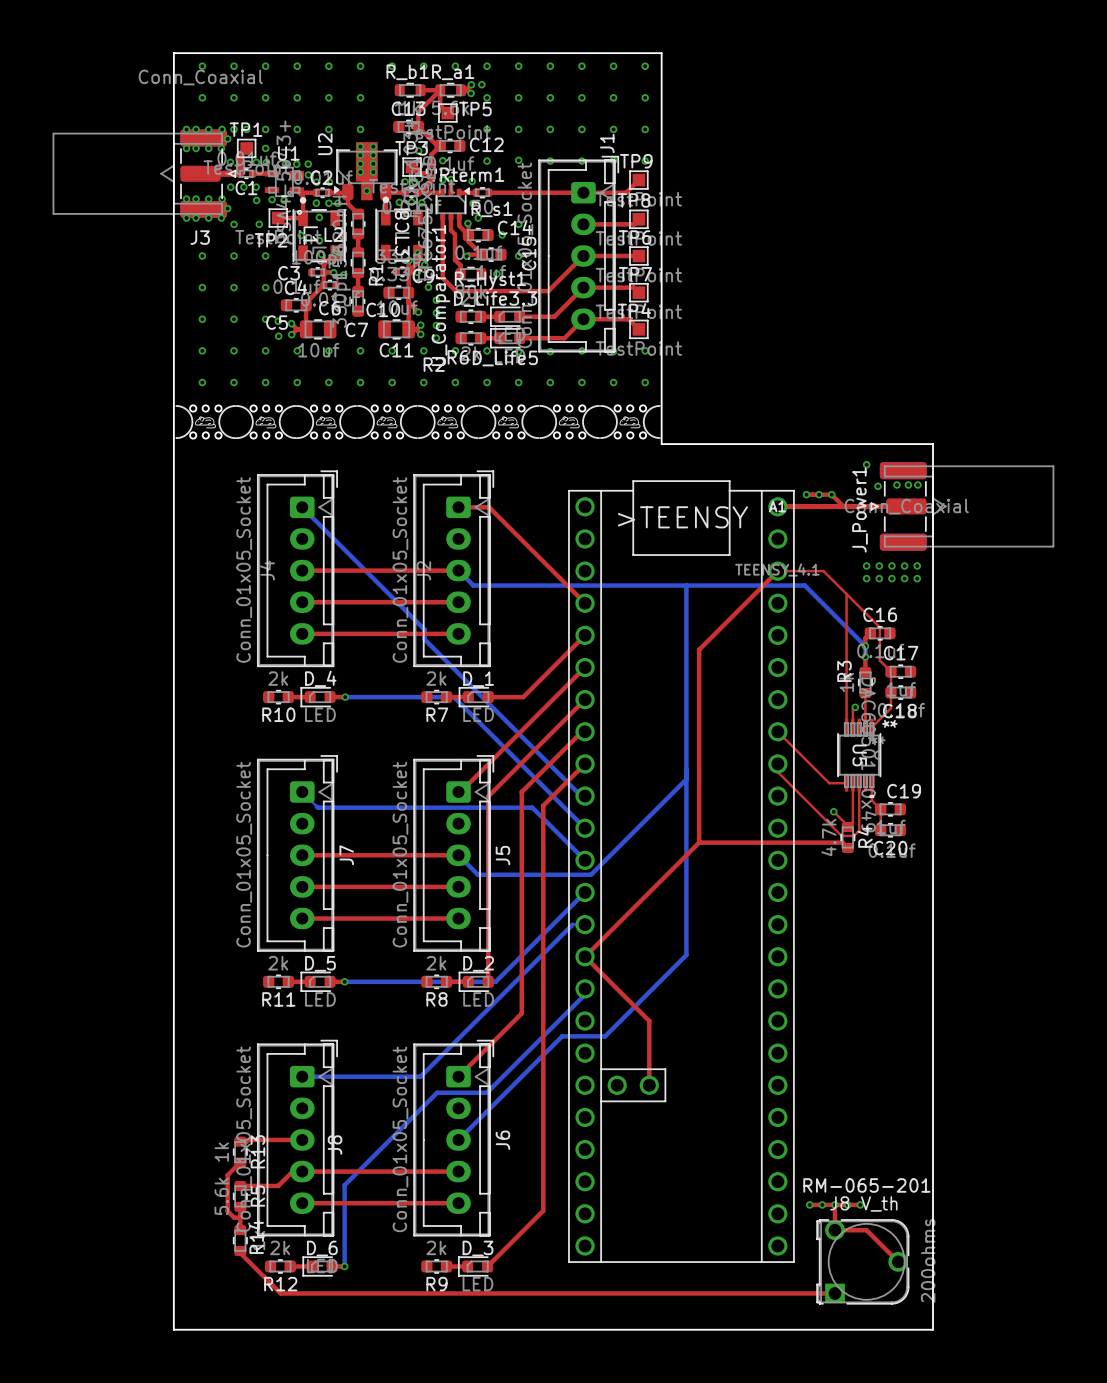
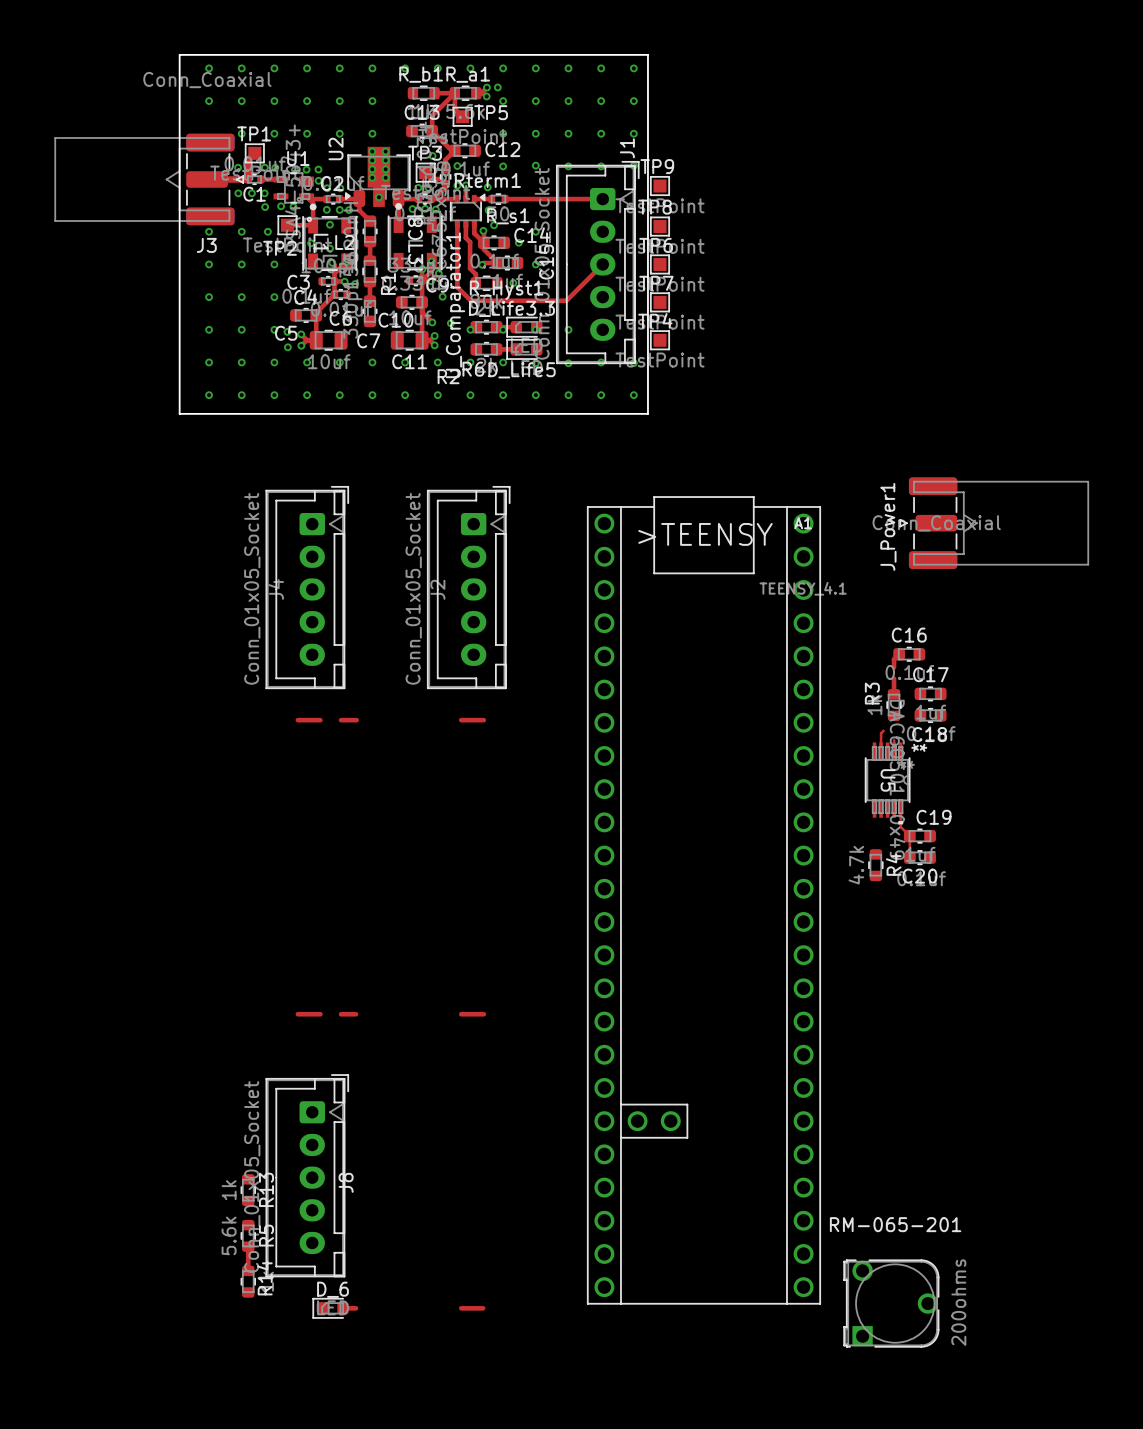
board edge: (627, 53) (661, 53) (661, 444) (932, 444) (932, 1329) (173, 1329) (173, 400) -> (647, 54) (647, 413) (179, 413)
via: (645, 66) -> none
via: (645, 97) -> none
via: (186, 129) -> none
via: (196, 129) -> none
via: (208, 129) -> none
via: (222, 129) -> none
via: (246, 129) -> none
via: (645, 129) -> none
via: (227, 138) -> none
via: (186, 148) -> none
via: (196, 148) -> none
via: (208, 148) -> none
via: (221, 148) -> none
via: (265, 148) -> none
via: (645, 161) -> none
top track: (638, 180) (626, 192) (583, 192) -> none
via: (186, 199) -> none
via: (196, 199) -> none
via: (208, 199) -> none
via: (222, 199) -> none
via: (227, 208) -> none
via: (186, 218) -> none
via: (196, 218) -> none
via: (208, 218) -> none
via: (221, 218) -> none
top track: (638, 219) (633, 224) (583, 224) -> none
via: none -> (209, 231)
top track: (583, 255) (638, 255) -> none
top track: (638, 292) (633, 287) (583, 287) (554, 316) (519, 316) -> none
via: (436, 300) -> none
via: none -> (470, 329)
via: none -> (503, 329)
via: none -> (535, 329)
via: none -> (568, 329)
via: (436, 325) -> none
top track: (638, 329) (628, 319) (583, 319) (564, 338) (519, 338) -> none
via: (436, 338) -> none
via: (645, 350) -> none
via: (645, 382) -> none
part: (387, 421) -> none
part: (448, 421) -> none
part: (508, 421) -> none
part: (569, 421) -> none
part: (630, 421) -> none
part: (205, 422) -> none
part: (266, 422) -> none
part: (326, 422) -> none
via: (866, 464) -> none
via: (896, 485) -> none
via: (908, 485) -> none
via: (917, 485) -> none
via: (878, 486) -> none
top track: (806, 494) (831, 494) (843, 506) -> none
via: (806, 494) -> none
via: (819, 494) -> none
via: (831, 494) -> none
top track: (906, 506) (777, 506) (873, 506) -> none
bottom track: (302, 507) (424, 629) (424, 639) (581, 796) -> none
top track: (458, 507) (489, 507) (585, 603) -> none
via: (866, 565) -> none
via: (879, 565) -> none
via: (891, 565) -> none
via: (904, 565) -> none
via: (917, 565) -> none
top track: (302, 570) (458, 570) -> none
bottom track: (458, 570) (473, 585) (804, 585) (865, 646) (865, 657) -> none
via: (866, 578) -> none
via: (879, 578) -> none
via: (891, 578) -> none
via: (904, 578) -> none
via: (917, 578) -> none
bottom track: (686, 585) (686, 955) (605, 1036) (562, 1036) (458, 1139) -> none
top track: (846, 594) (846, 727) -> none
top track: (302, 602) (458, 602) -> none
top track: (302, 633) (458, 633) -> none
top track: (585, 635) (523, 697) (488, 697) -> none
via: (865, 646) -> none
via: (865, 657) -> none
top track: (585, 667) (458, 792) -> none
top track: (865, 692) (865, 716) -> none
R10: 2k (278, 697) -> none
D_4: LED (318, 697) -> none
bottom track: (345, 697) (453, 697) (585, 828) -> none
via: (345, 697) -> none
R7: 2k (436, 697) -> none
D_1: LED (476, 697) -> none
top track: (585, 699) (488, 796) (488, 981) -> none
via: (855, 707) -> none
top track: (872, 727) (890, 708) (890, 671) (879, 660) (879, 627) (823, 571) (777, 571) (699, 649) (699, 842) -> none
top track: (585, 731) (582, 731) (521, 792) (521, 1013) (458, 1076) -> none
top track: (777, 731) (829, 783) (846, 783) -> none
top track: (585, 763) (543, 805) (543, 1210) (487, 1266) -> none
top track: (777, 763) (777, 772) (841, 835) (854, 835) (859, 830) (859, 783) -> none
bottom track: (686, 779) (591, 874) (478, 874) (458, 855) -> none
top track: (852, 783) (852, 822) (847, 827) (833, 811) -> none
bottom track: (302, 792) (317, 807) (532, 807) (585, 860) -> none
via: (833, 811) -> none
top track: (699, 842) (842, 842) (847, 847) -> none
top track: (699, 842) (585, 956) (649, 1021) (649, 1085) -> none
J7: Conn_01x05_Socket (297, 853) -> none
J5: Conn_01x05_Socket (453, 853) -> none
top track: (302, 855) (458, 855) -> none
top track: (302, 886) (458, 886) -> none
bottom track: (585, 892) (495, 981) (344, 981) -> none
top track: (302, 918) (458, 918) -> none
bottom track: (585, 924) (572, 924) (420, 1076) (302, 1076) -> none
R11: 2k (278, 981) -> none
D_5: LED (318, 981) -> none
via: (344, 981) -> none
R8: 2k (436, 981) -> none
D_2: LED (476, 981) -> none
bottom track: (585, 988) (585, 994) (486, 1092) (437, 1092) (344, 1185) (344, 1266) -> none
J6: Conn_01x05_Socket (453, 1138) -> none
top track: (302, 1139) (240, 1141) -> none
top track: (240, 1162) (227, 1175) (227, 1211) (234, 1217) (240, 1217) -> none
top track: (458, 1171) (292, 1171) (278, 1185) (240, 1185) -> none
top track: (302, 1203) (458, 1203) -> none
text: J8 V_th (863, 1203) -> none
top track: (809, 1204) (860, 1204) -> none
via: (809, 1204) -> none
via: (822, 1204) -> none
top track: (834, 1204) (834, 1230) (866, 1230) (898, 1261) -> none
via: (834, 1204) -> none
via: (847, 1204) -> none
via: (860, 1204) -> none
top track: (240, 1251) (280, 1293) (834, 1293) -> none
R12: 2k (280, 1266) -> none
top track: (290, 1266) (312, 1266) -> none
via: (344, 1266) -> none
R9: 2k (436, 1266) -> none
D_3: LED (475, 1266) -> none

